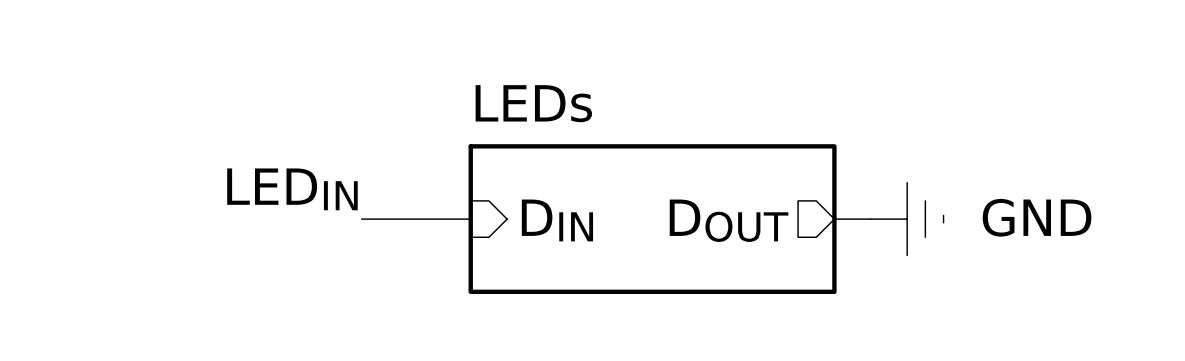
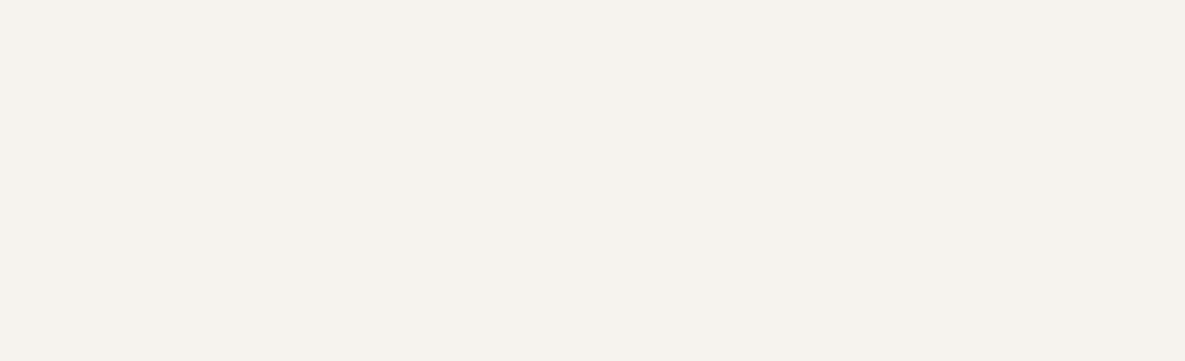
label: LEDIN (292, 189) -> none
wire: (361, 219) (470, 219) -> none
sheet LEDs: (652, 219) -> none
wire: (834, 219) (870, 219) -> none
power symbol: GND (907, 219) -> none
sheet pin: DIN (557, 220) -> none
sheet pin: DOUT (729, 220) -> none

